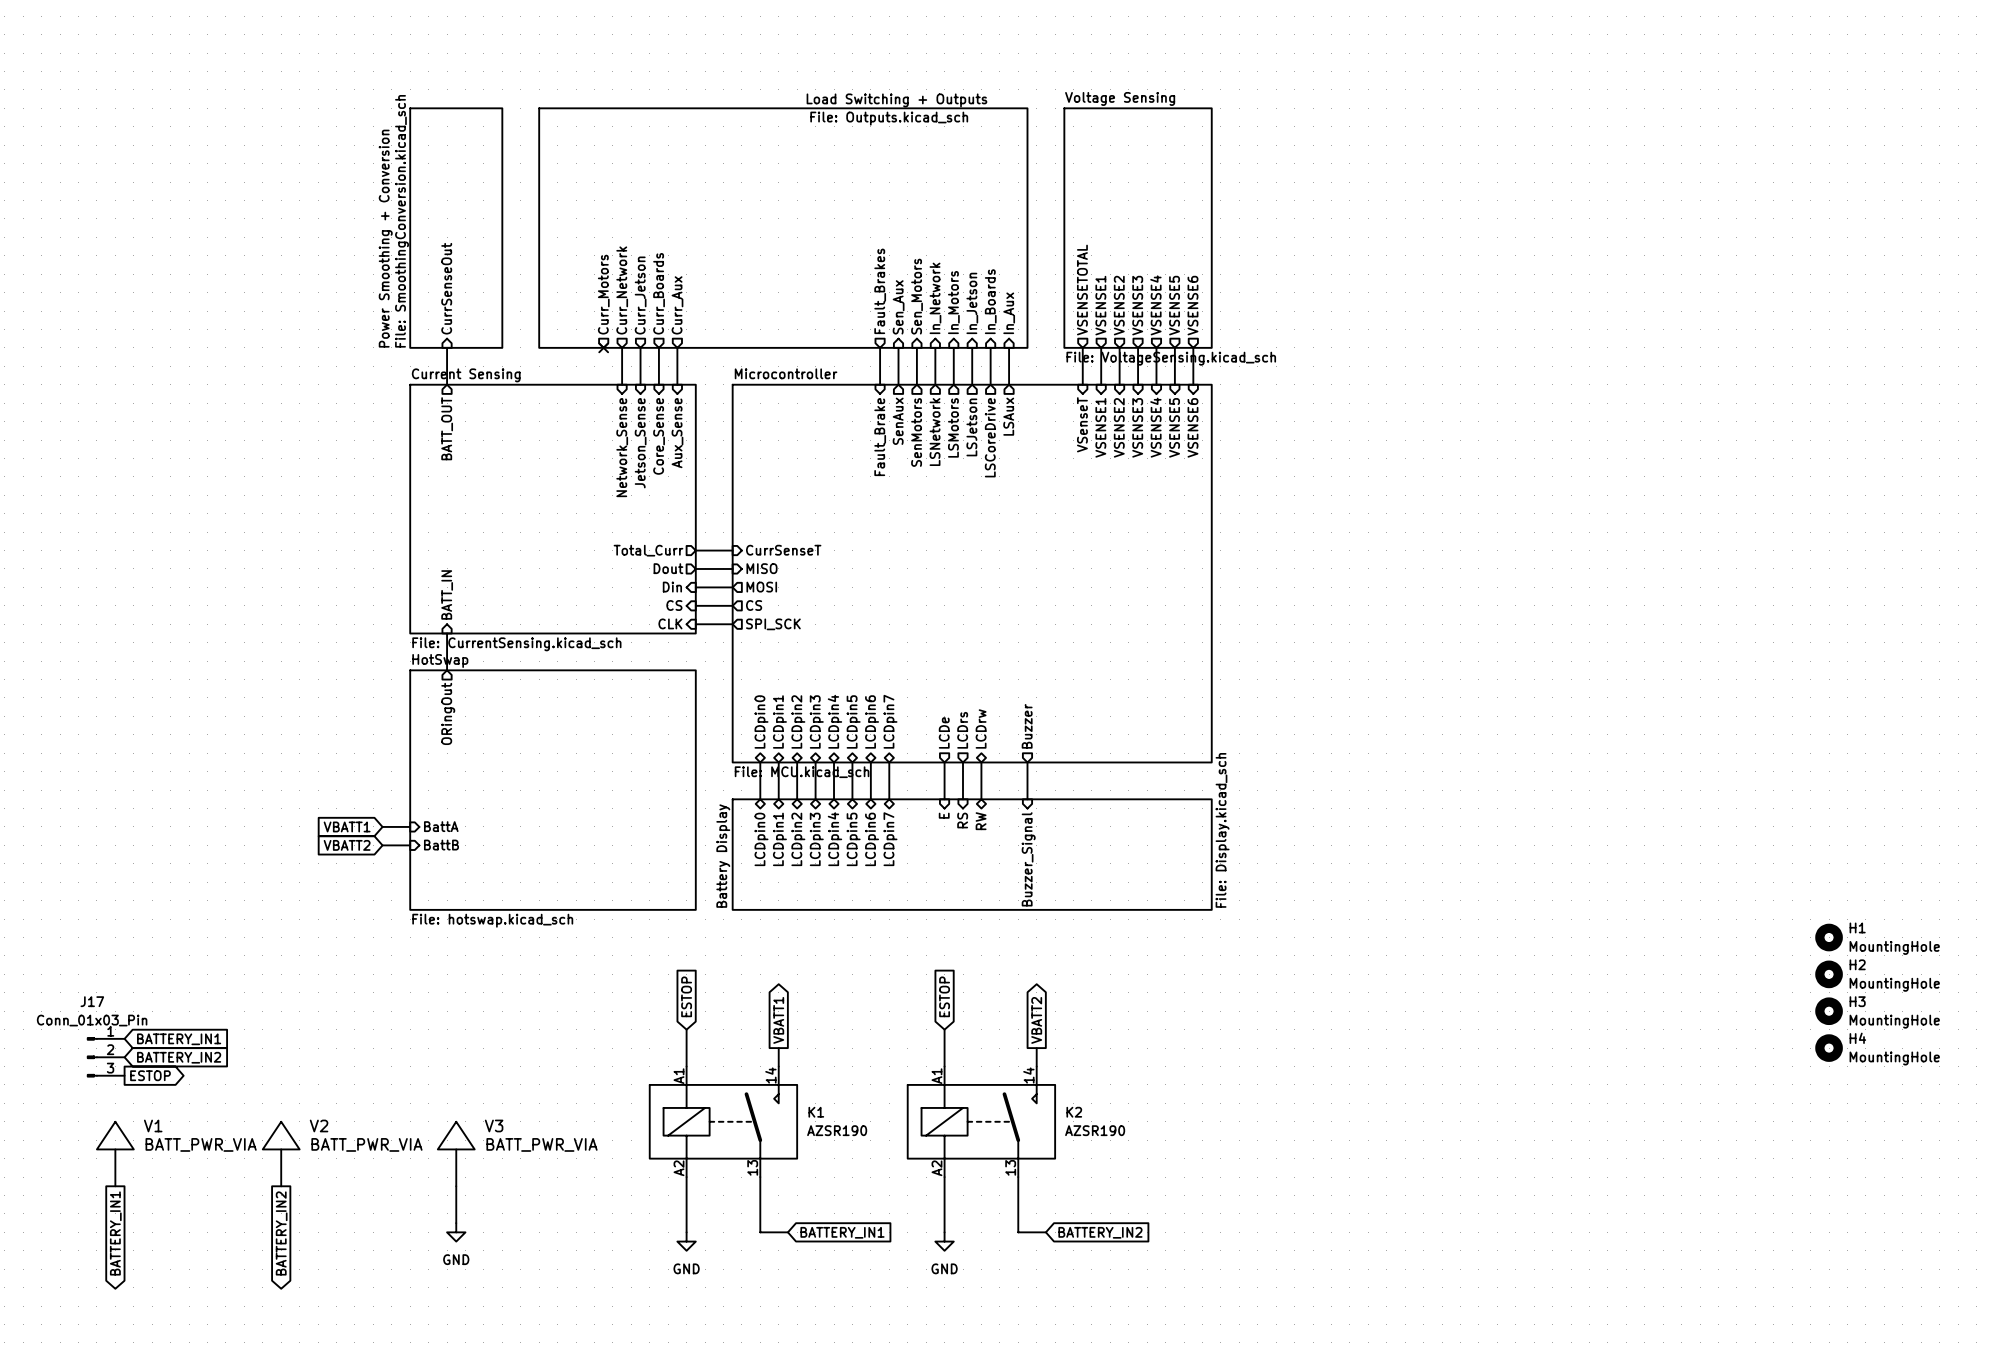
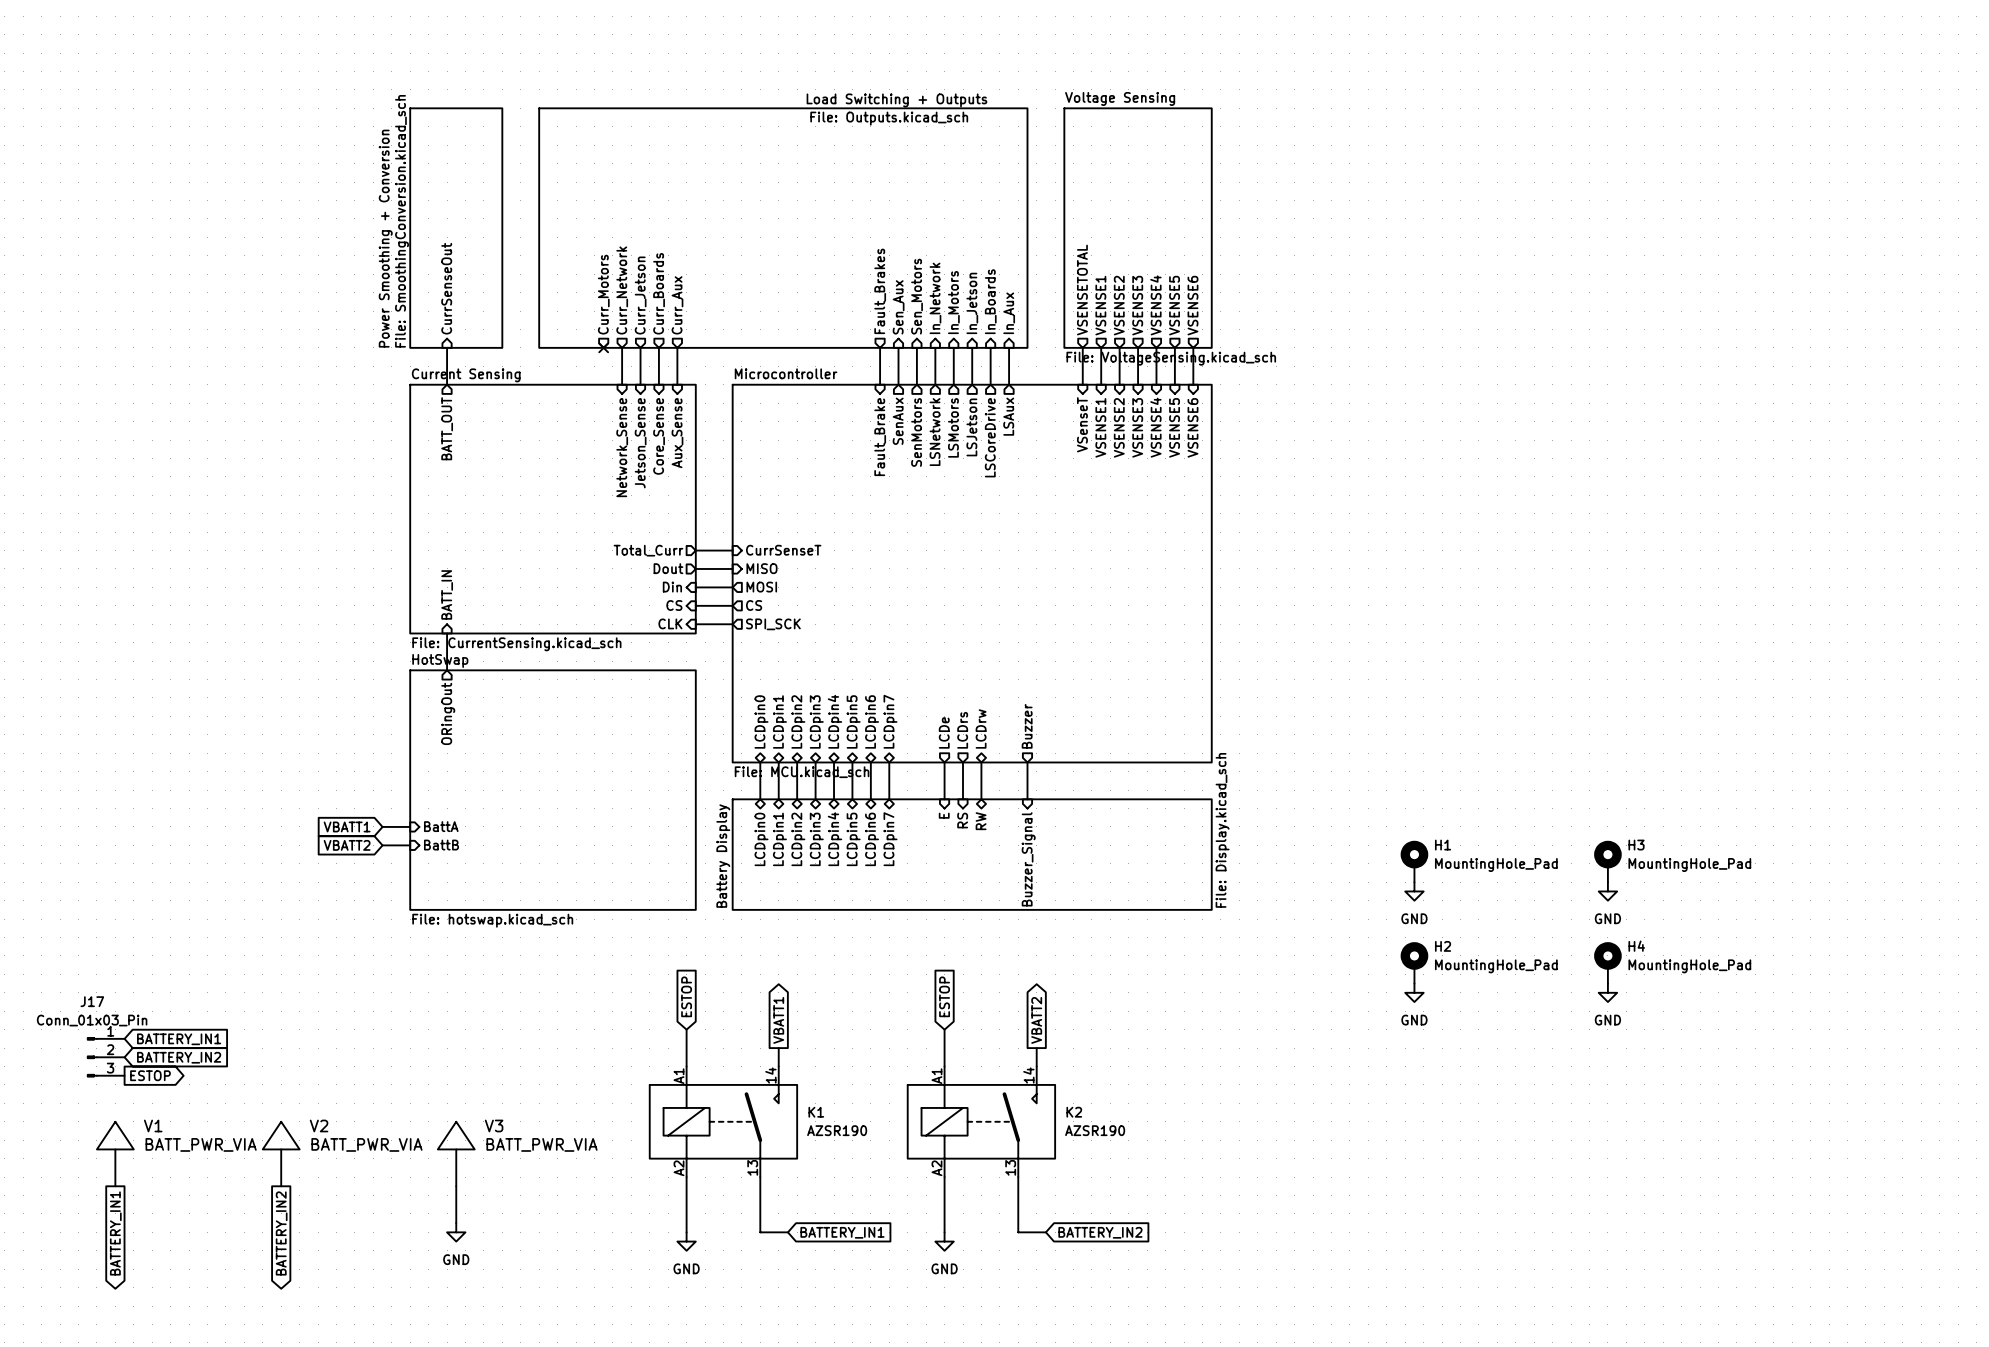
power symbol: none -> GND (1414, 891)
power symbol: none -> GND (1607, 891)
H1 symbol: [1815, 923, 1843, 952] -> [1400, 840, 1429, 883]
H1 value: MountingHole (1894, 947) -> MountingHole_Pad (1496, 865)
H2 symbol: [1815, 960, 1843, 989] -> [1400, 942, 1429, 984]
H2 value: MountingHole (1894, 984) -> MountingHole_Pad (1496, 966)
power symbol: none -> GND (1414, 992)
power symbol: none -> GND (1607, 992)
H3 symbol: [1815, 997, 1843, 1026] -> [1594, 840, 1622, 883]
H3 value: MountingHole (1894, 1021) -> MountingHole_Pad (1689, 865)
H4 symbol: [1815, 1034, 1843, 1062] -> [1594, 942, 1622, 984]
H4 value: MountingHole (1894, 1058) -> MountingHole_Pad (1689, 966)

